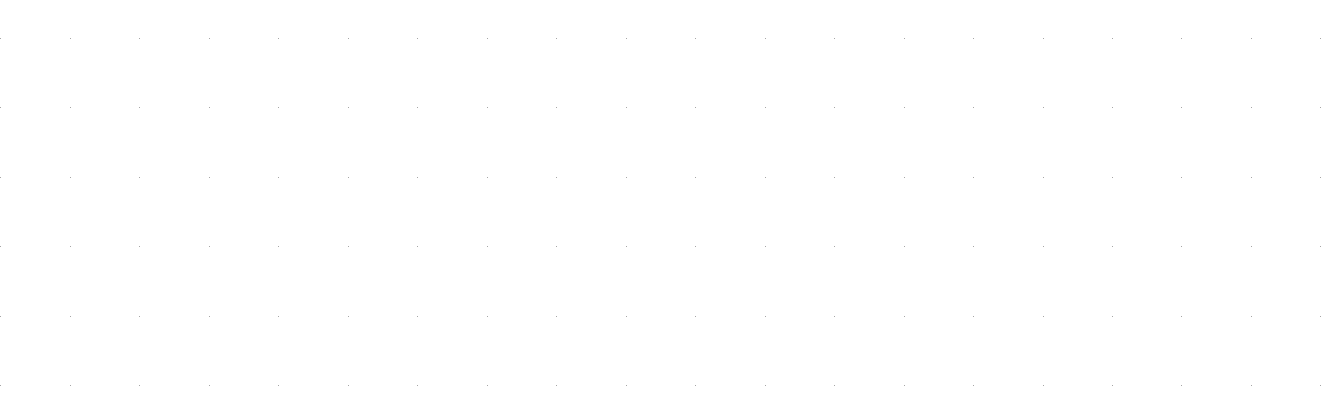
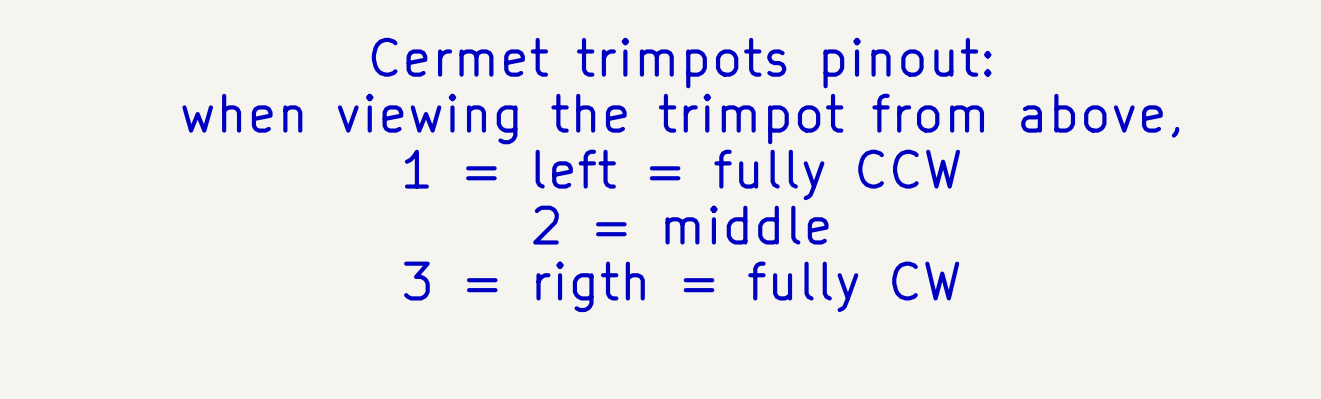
text: none -> Cermet trimpots pinout: (681, 63)
text: none -> when viewing the trimpot from above, (680, 119)
text: none -> 1 = left = fully CCW (682, 174)
text: none -> 2 = middle (680, 225)
text: none -> 3 = rigth = fully CW (681, 286)

